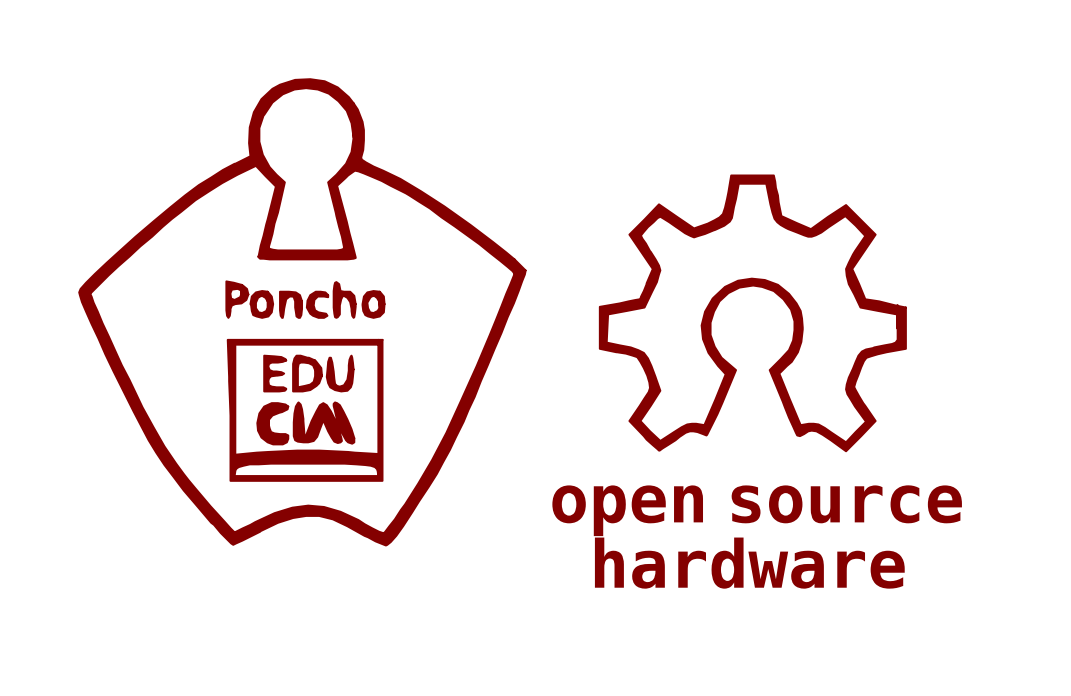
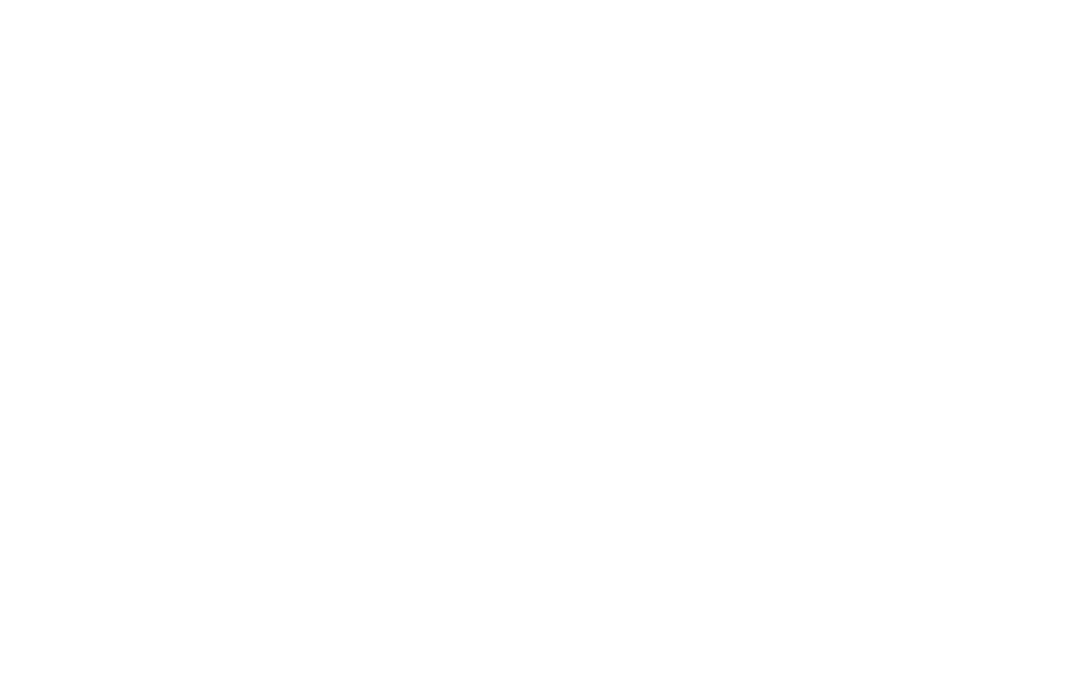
power symbol: (302, 312) -> none
power symbol: (752, 313) -> none

